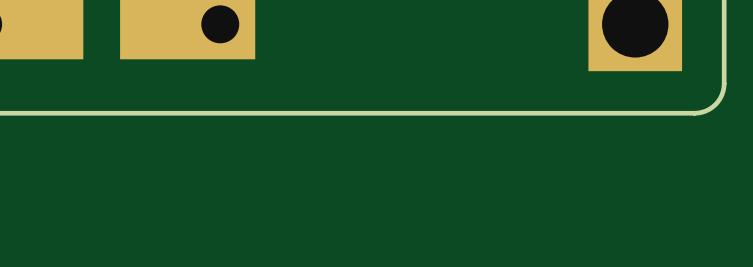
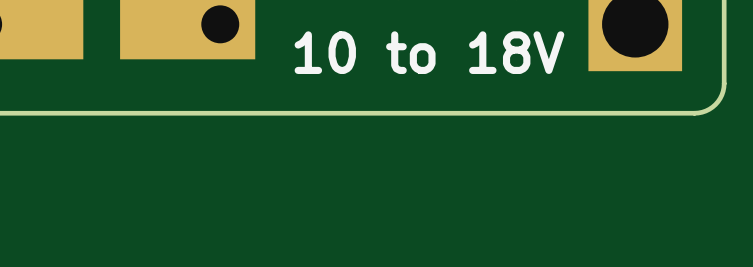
text: none -> 10 to 18V (429, 52)

